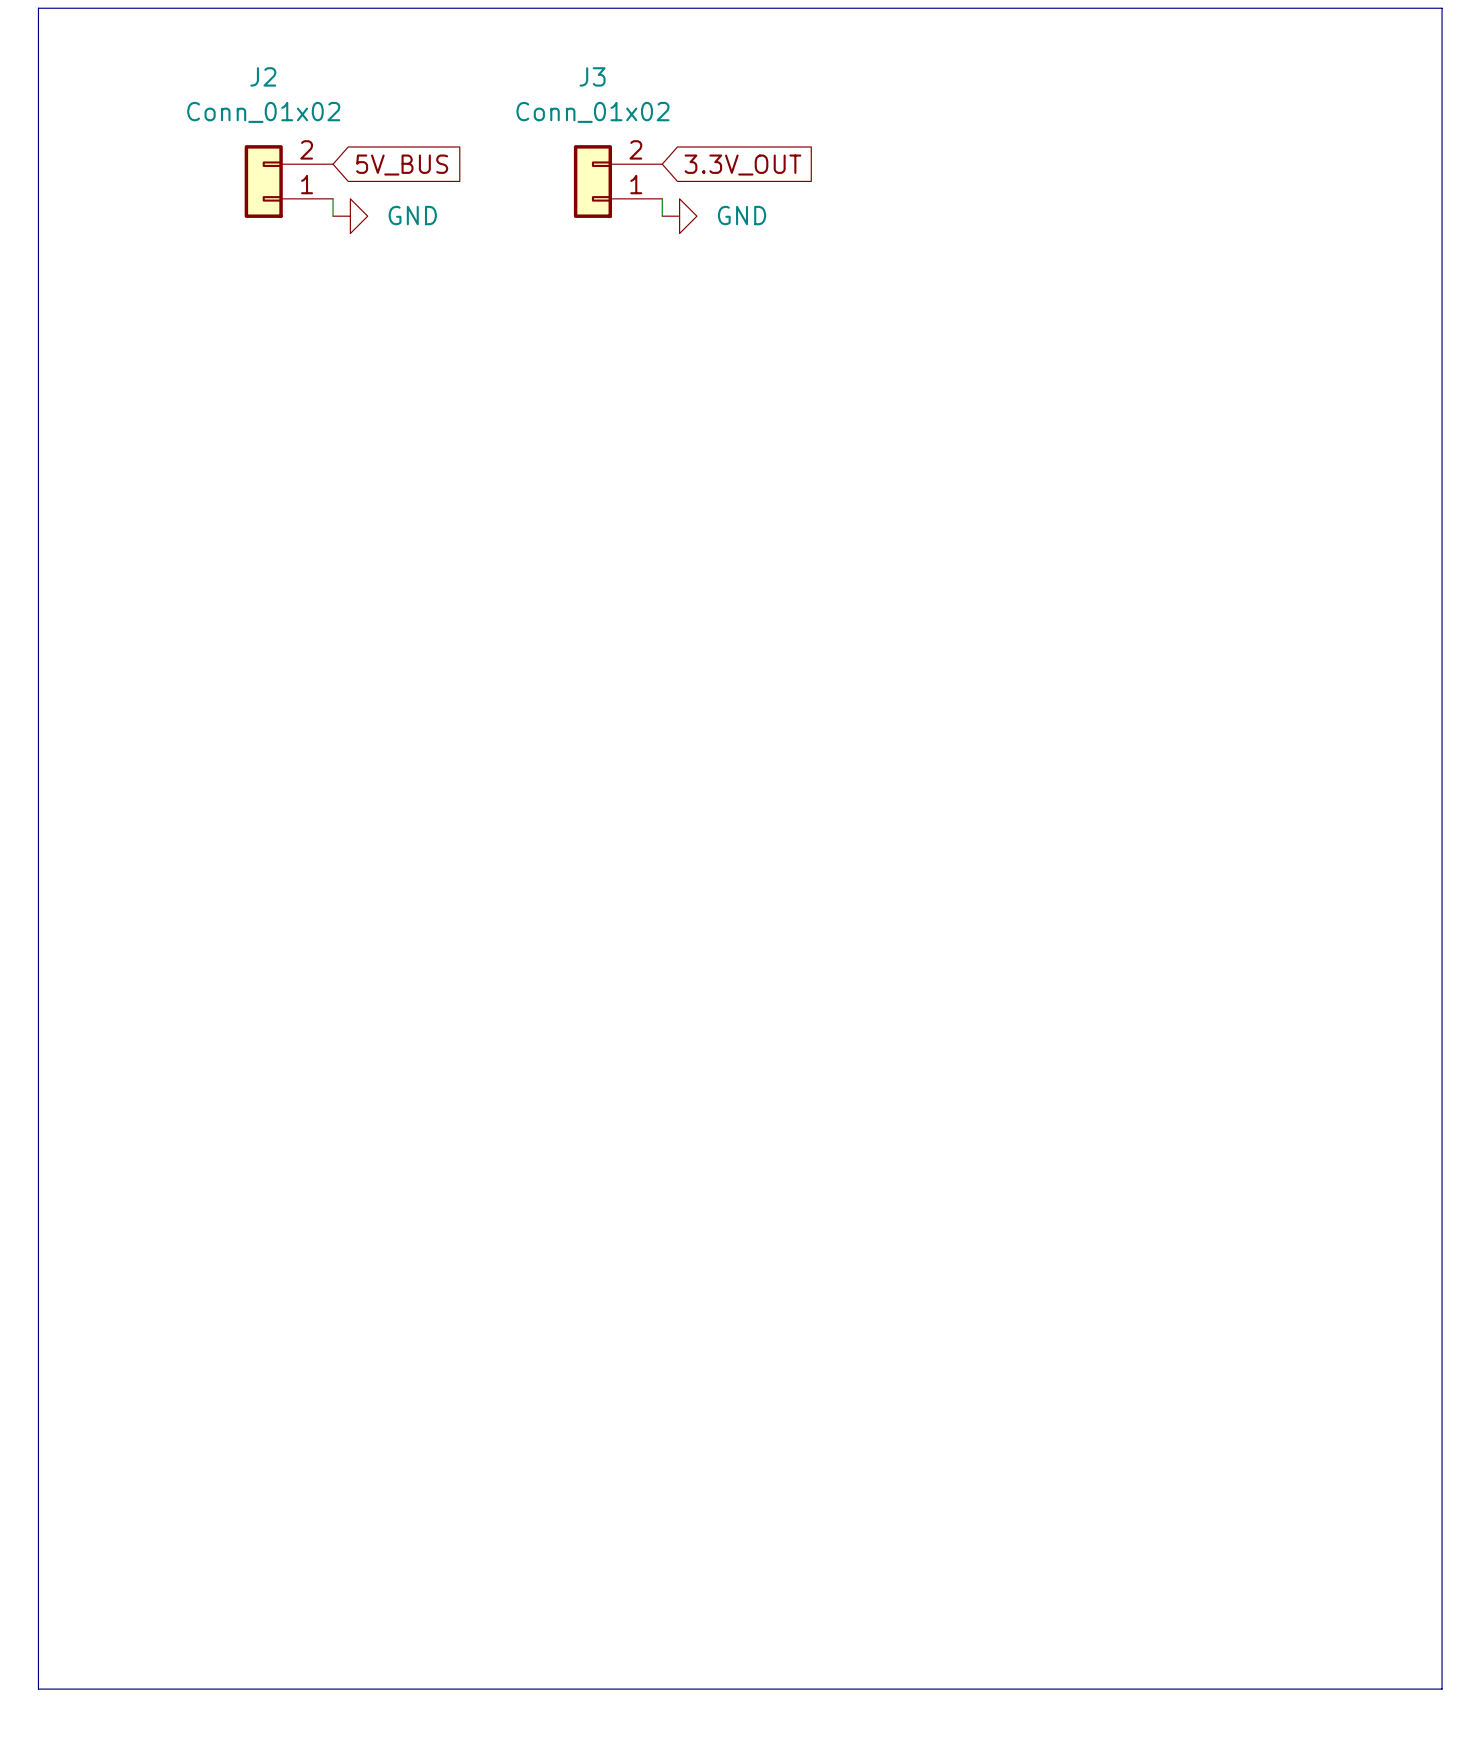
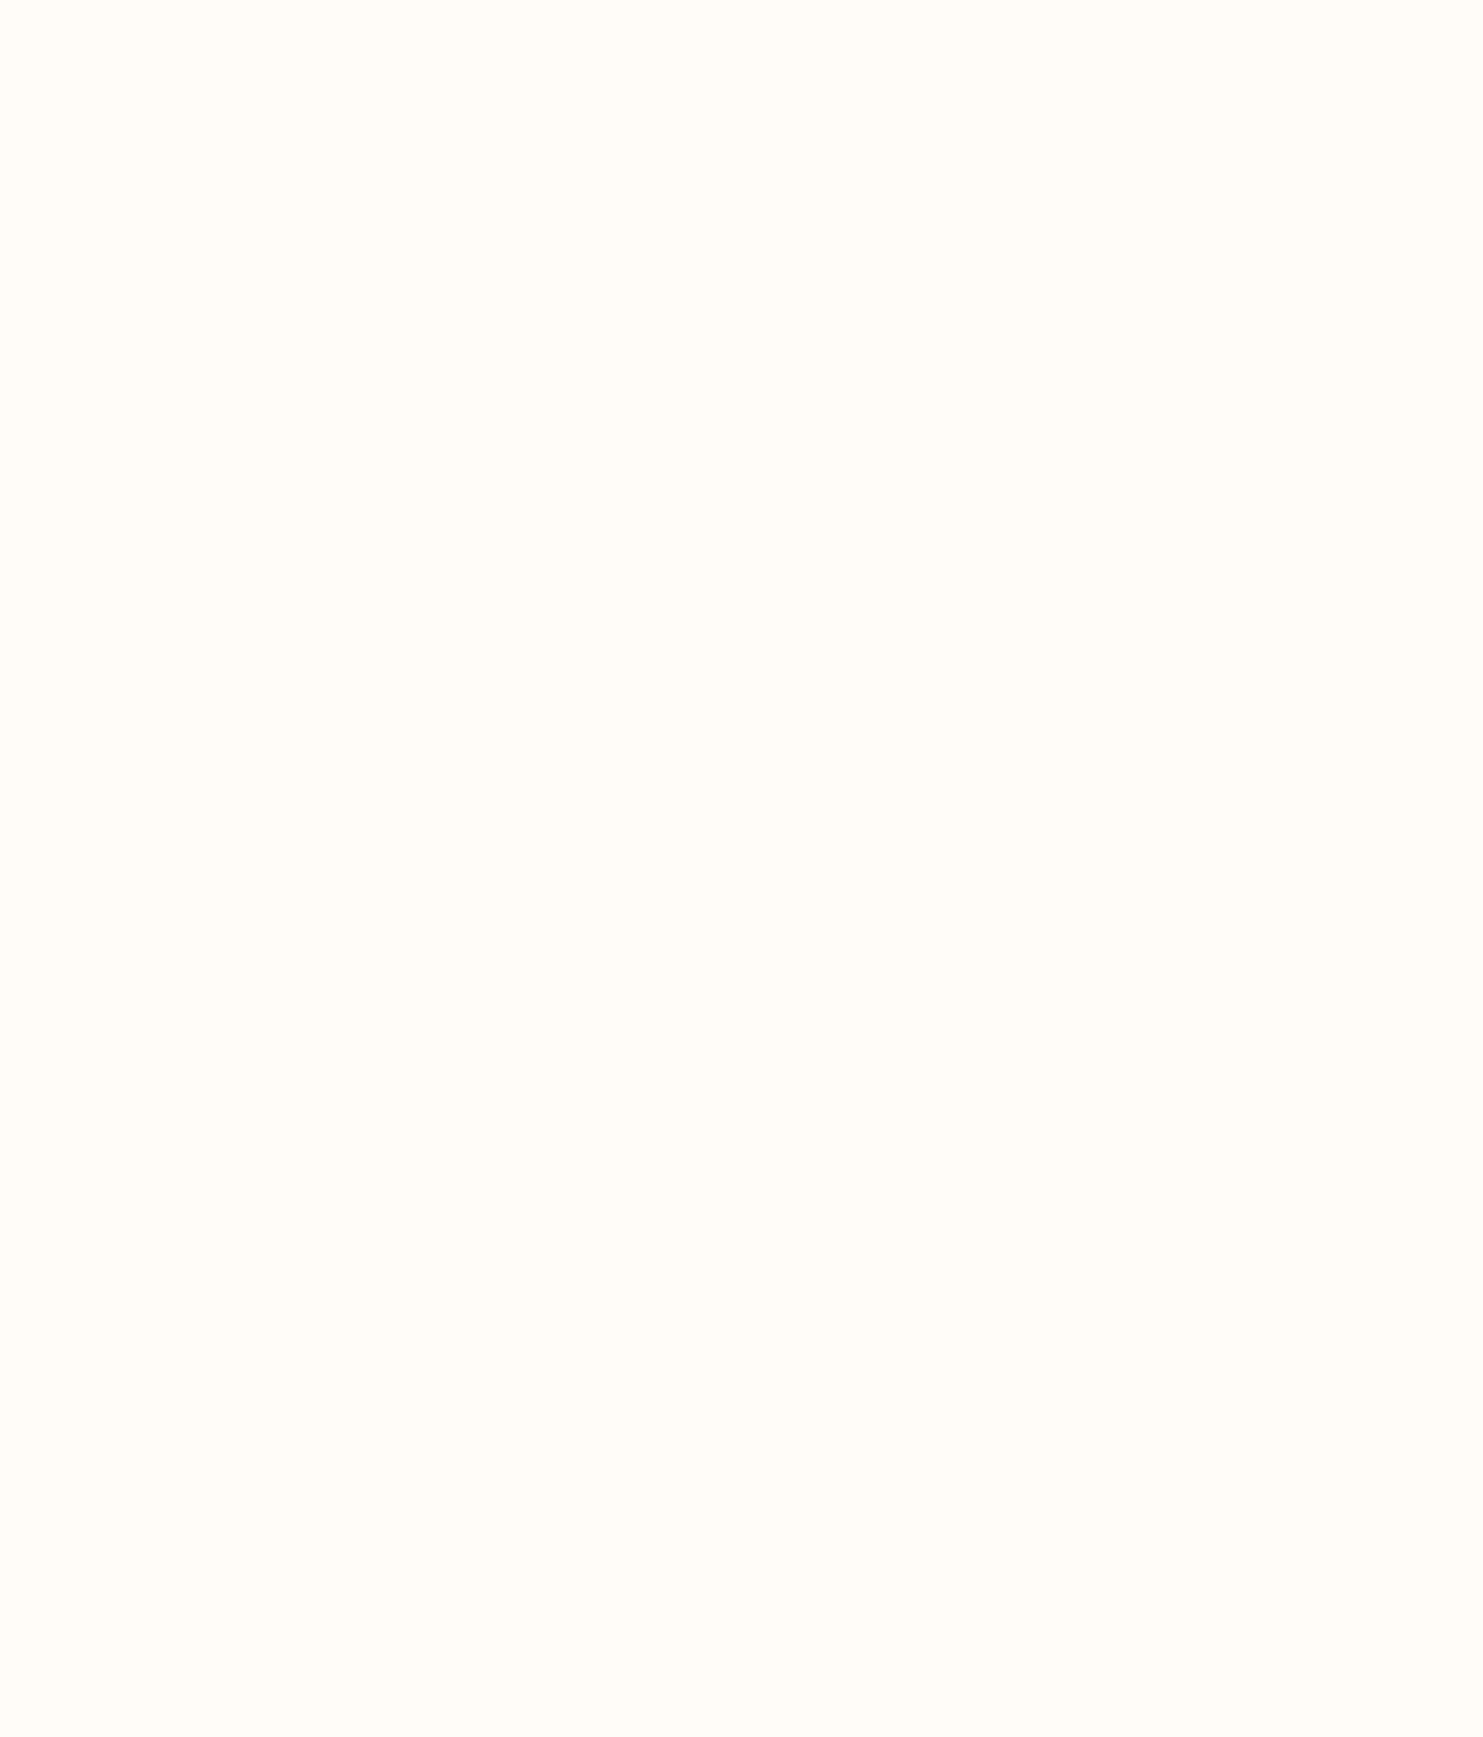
line: (38, 8) (1442, 8) (1442, 1689) (38, 1689) (38, 8) -> none
global label: 5V_BUS (402, 165) -> none
global label: 3.3V_OUT (742, 165) -> none
J2: Conn_01x02 (288, 181) -> none
J3: Conn_01x02 (618, 181) -> none
wire: (333, 198) (333, 216) -> none
wire: (662, 198) (662, 216) -> none
power symbol: GND (350, 216) -> none
power symbol: GND (679, 216) -> none

